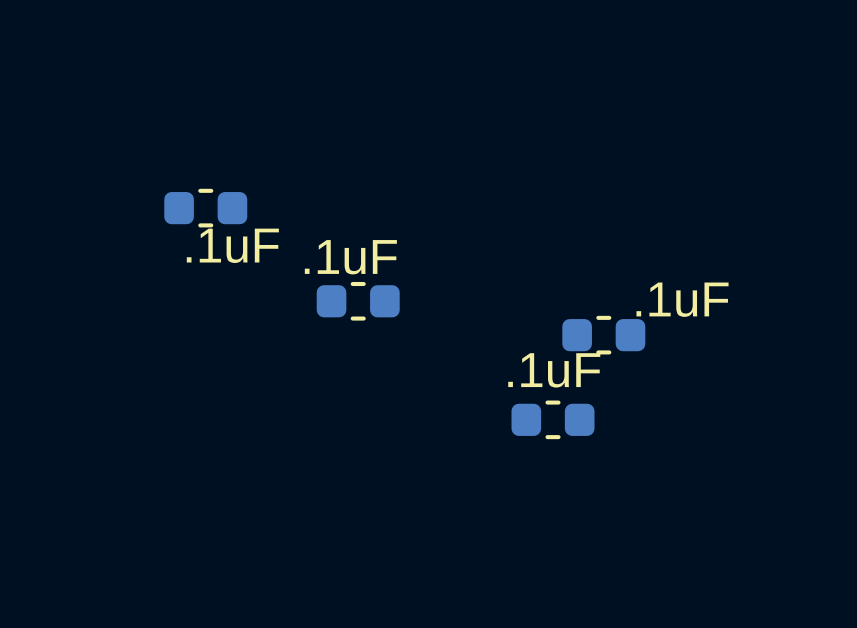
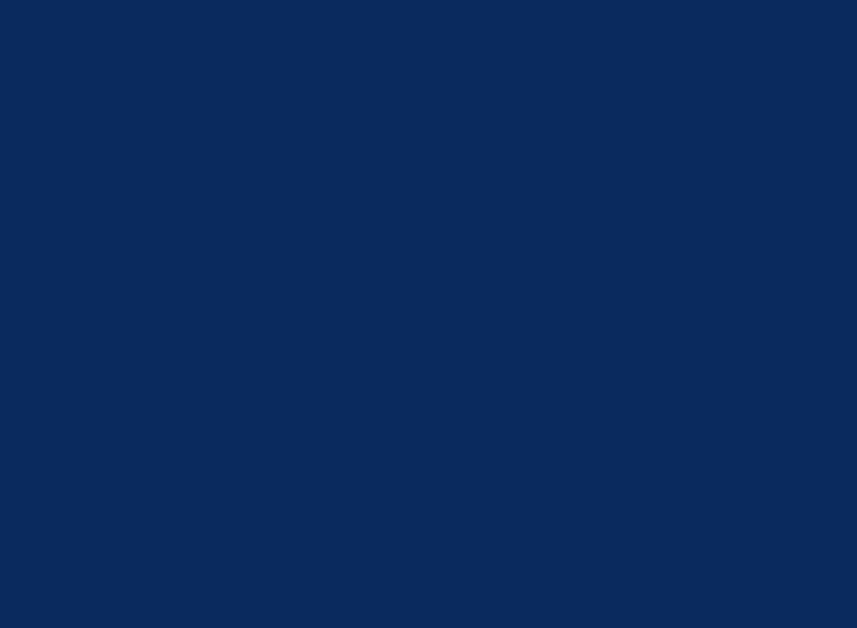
part: .1uF (205, 208) -> none
part: .1uF (358, 301) -> none
part: .1uF (603, 335) -> none
part: .1uF (553, 419) -> none

